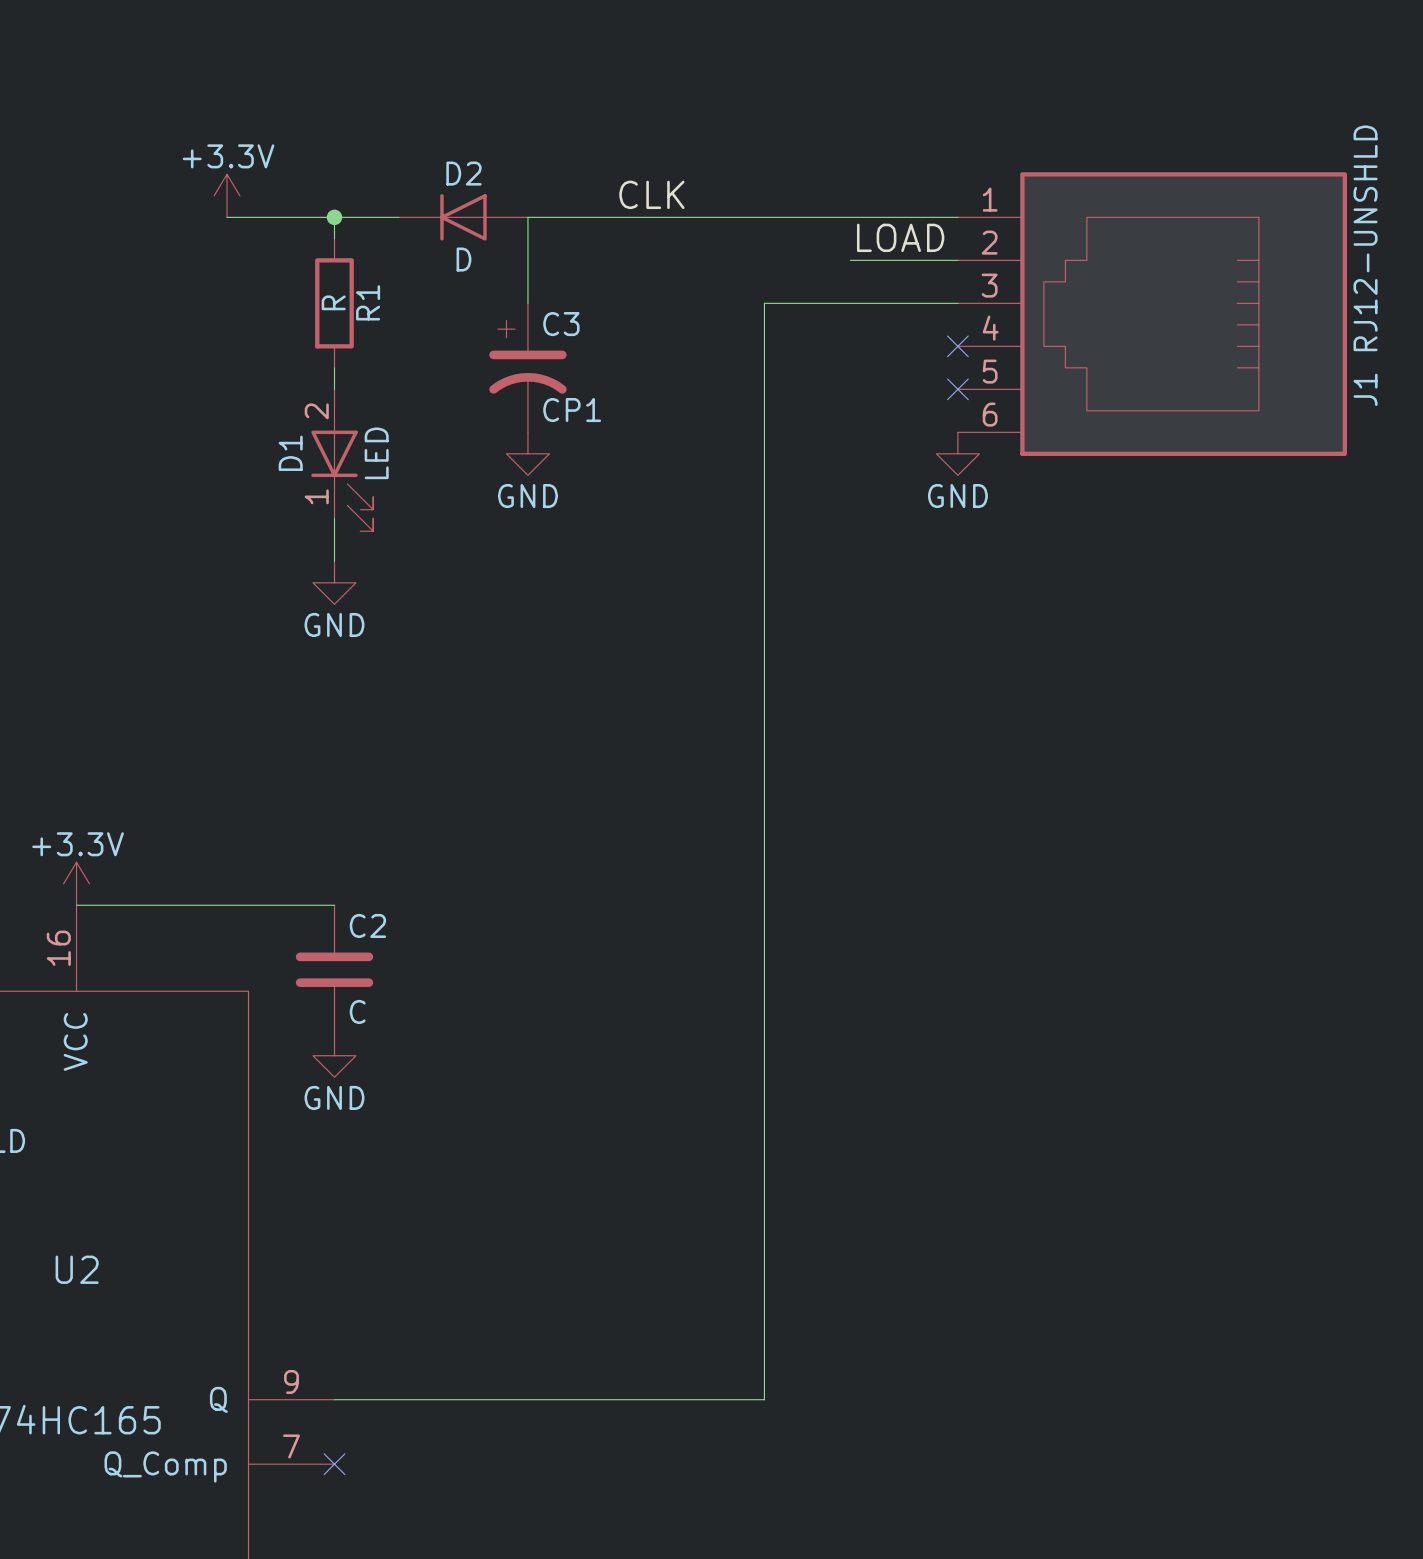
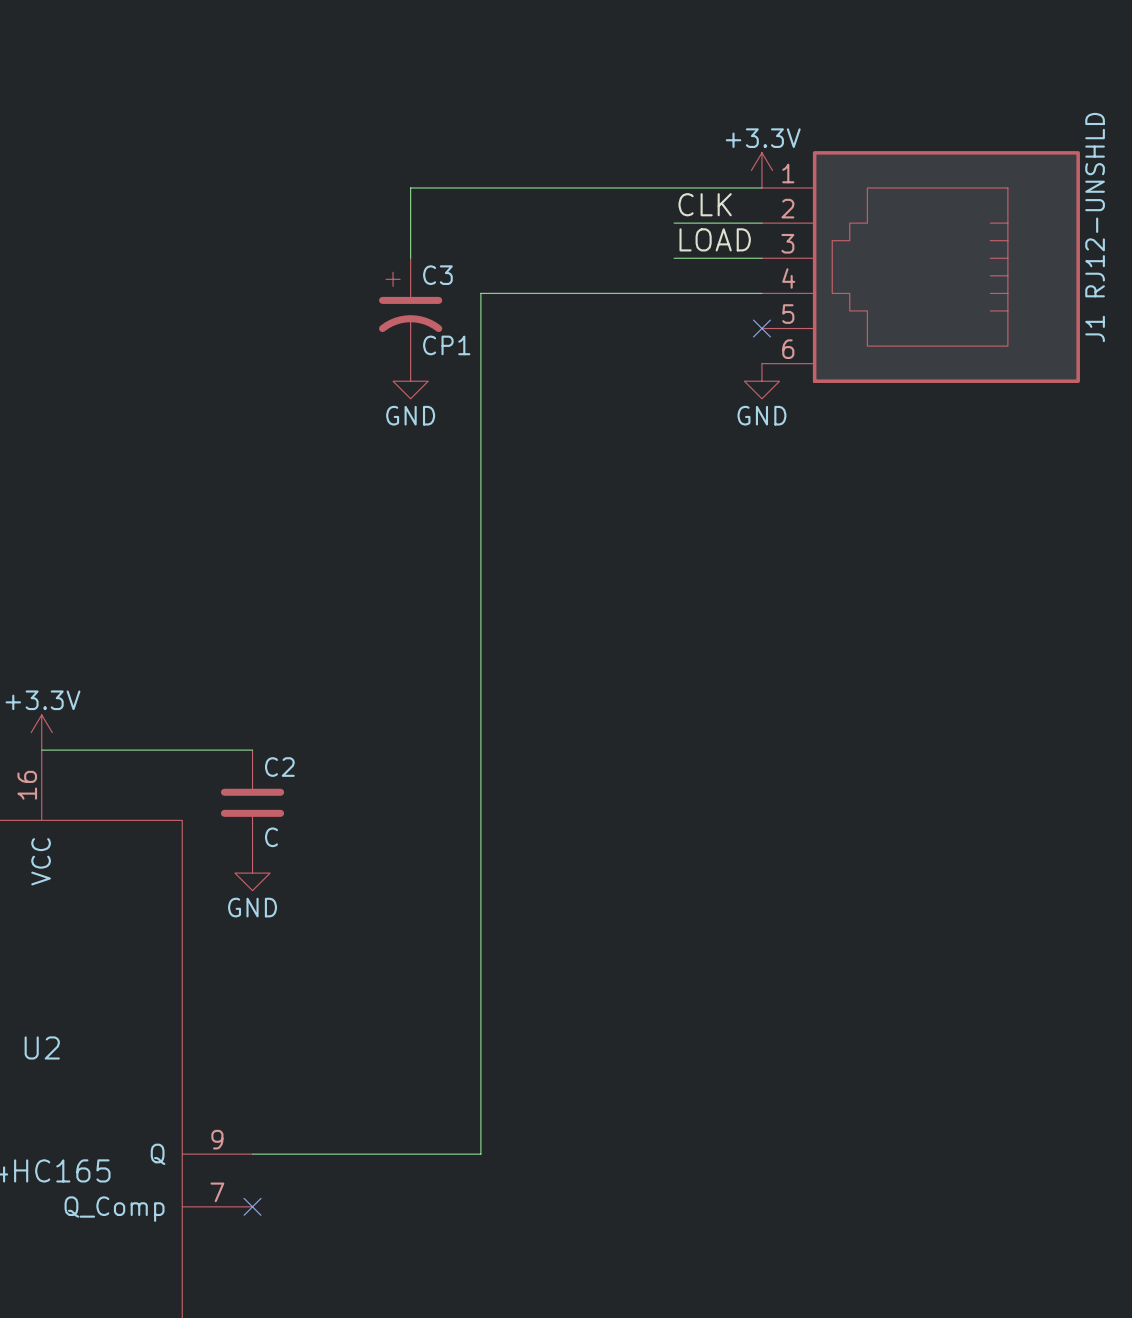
label: CLK (651, 194) -> none
power symbol: +3.3V (227, 195) -> none
power symbol: none -> +3.3V (761, 170)
wire: (227, 217) (398, 217) -> none
wire: (334, 217) (334, 238) -> none
junction: (334, 217) -> none
D2: D (463, 217) -> none
label: LOAD (900, 237) -> CLK (705, 204)
label: none -> LOAD (715, 239)
R1: R (334, 303) -> none
wire: (850, 303) (764, 303) (764, 1399) (613, 1399) -> (761, 293) (480, 293) (480, 1154)
no-connect mark: (957, 346) -> none
wire: (334, 367) (334, 389) -> none
D1: LED (342, 460) -> none
wire: (334, 518) (334, 561) -> none
power symbol: GND (334, 582) -> none

